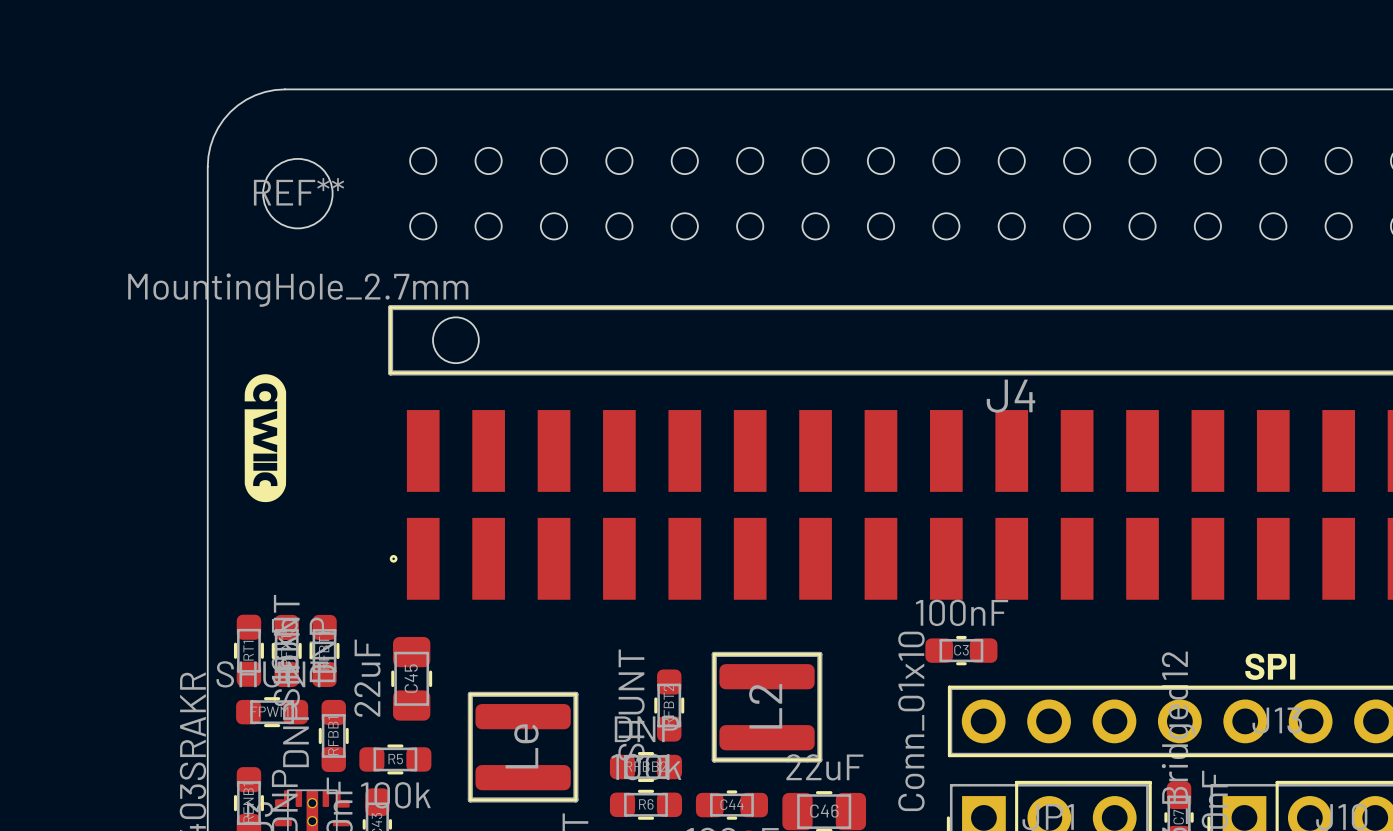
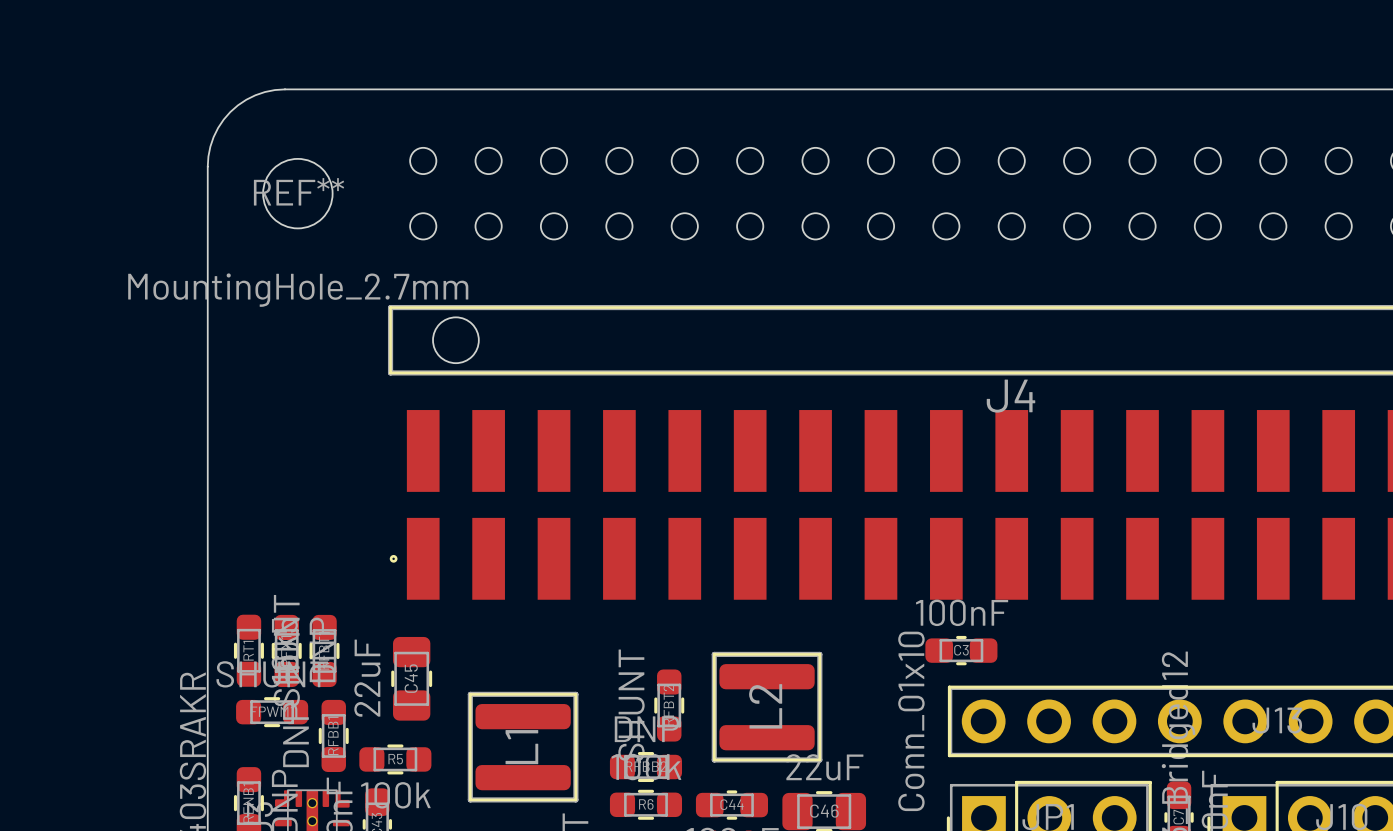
drawing: [244, 374, 287, 503] -> none
text: SPI (1270, 666) -> none
Le name: Le (522, 746) -> L1 (521, 747)

